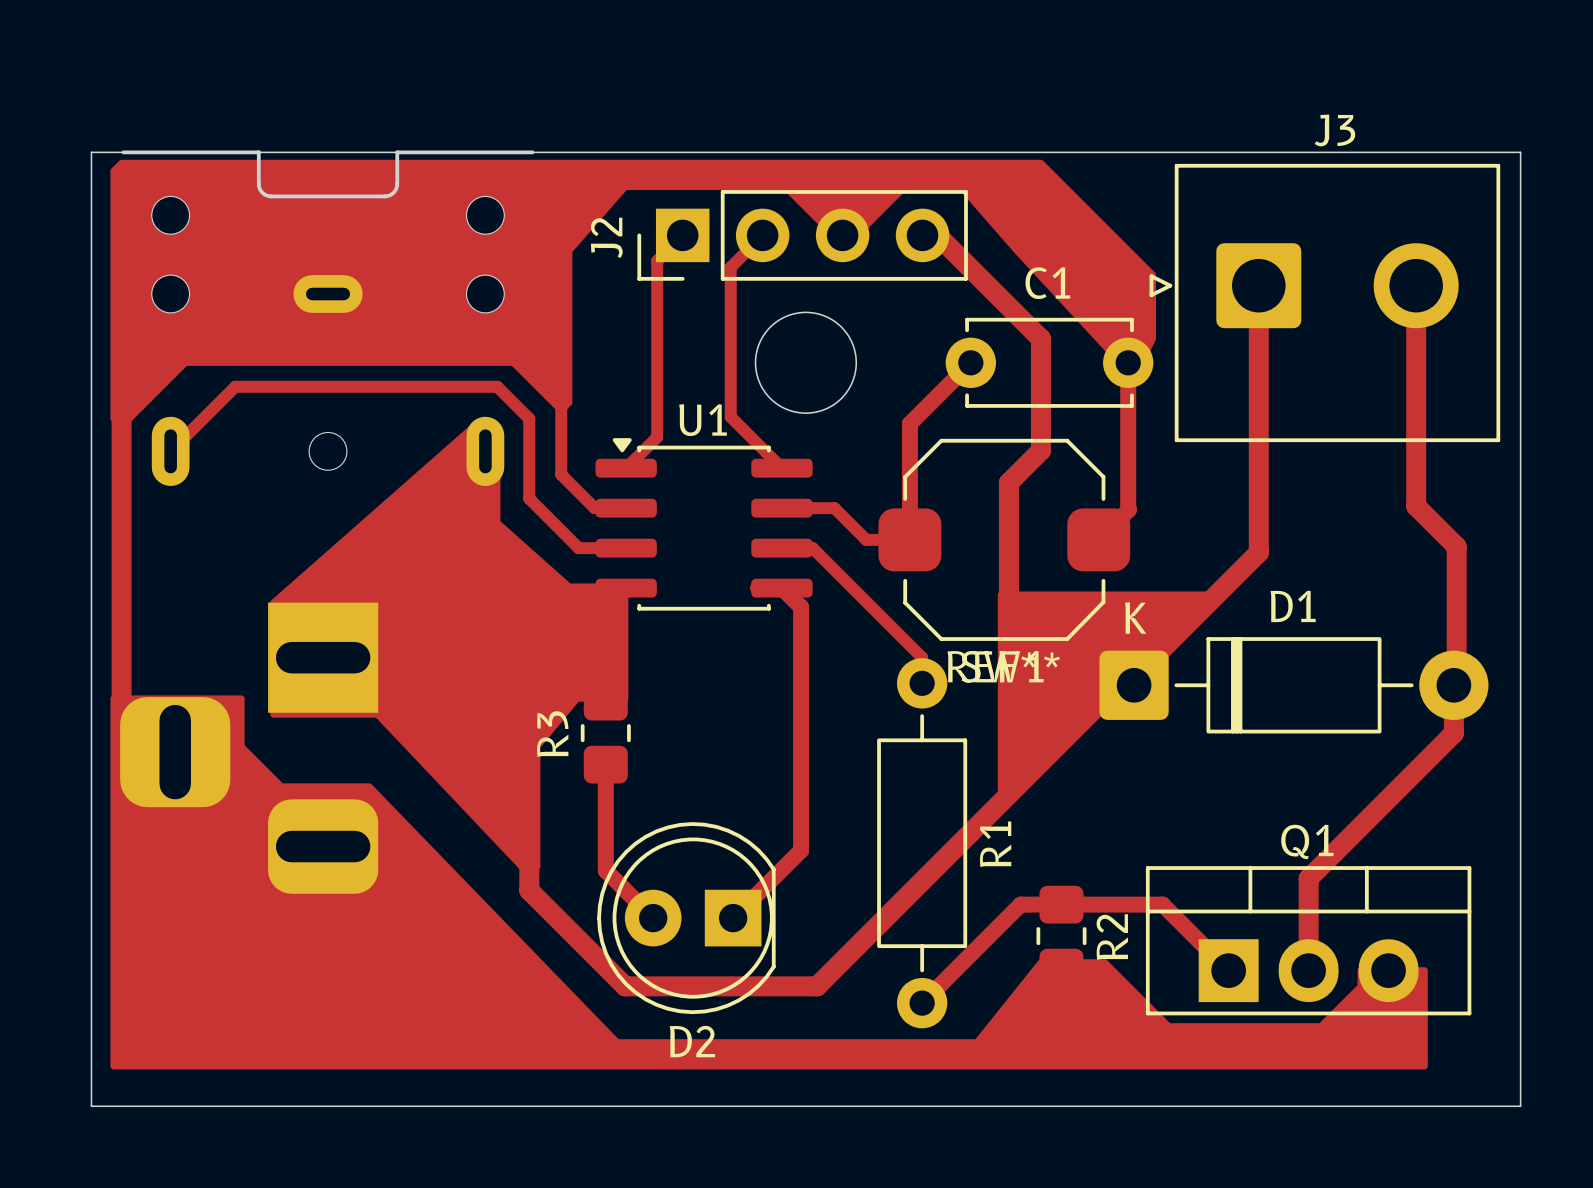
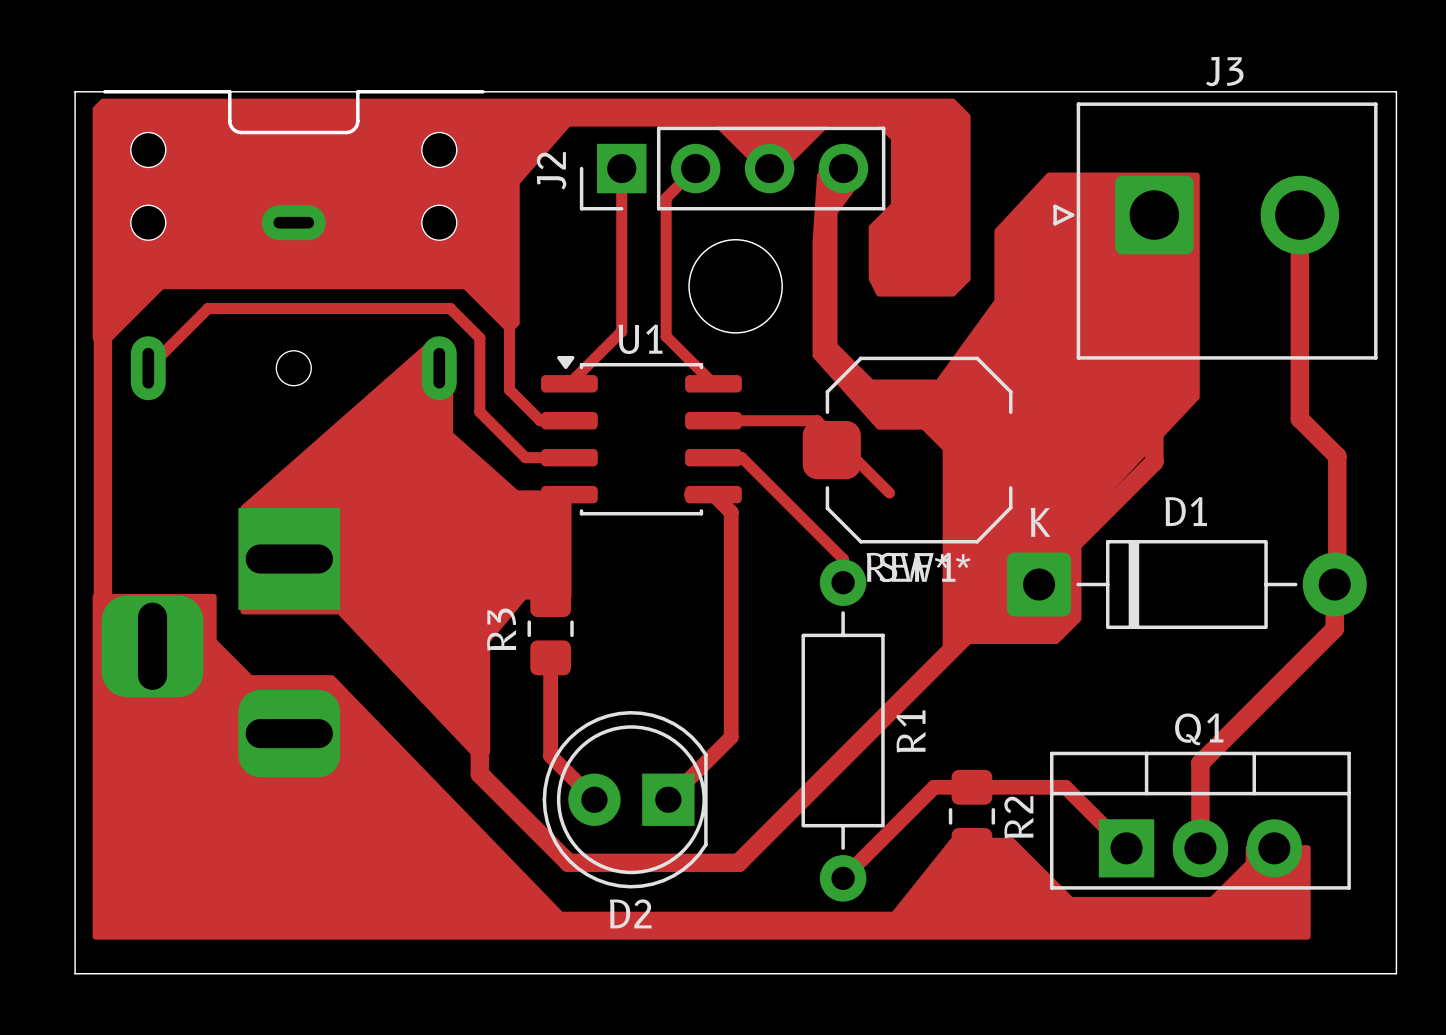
drawing: [110, 159, 1157, 422] -> none
drawing: none -> [92, 98, 1200, 659]
top track: (682, 235) (657, 260) (657, 437) -> (621, 168) (621, 331) (598, 355)
top track: (922, 235) (937, 235) (1040, 338) (1040, 450) (1008, 482) (1008, 602) (1091, 685) (1134, 685) -> none
top track: (970, 362) (909, 423) (909, 539) (866, 539) (834, 508) -> (889, 493) (817, 420) (762, 420)
C1: (1049, 362) -> none
top track: (1128, 362) (1128, 509) (1098, 539) -> none
drawing: [997, 591, 1220, 814] -> none
top track: (1118, 685) (817, 986) (809, 986) -> (993, 607) (738, 862)

